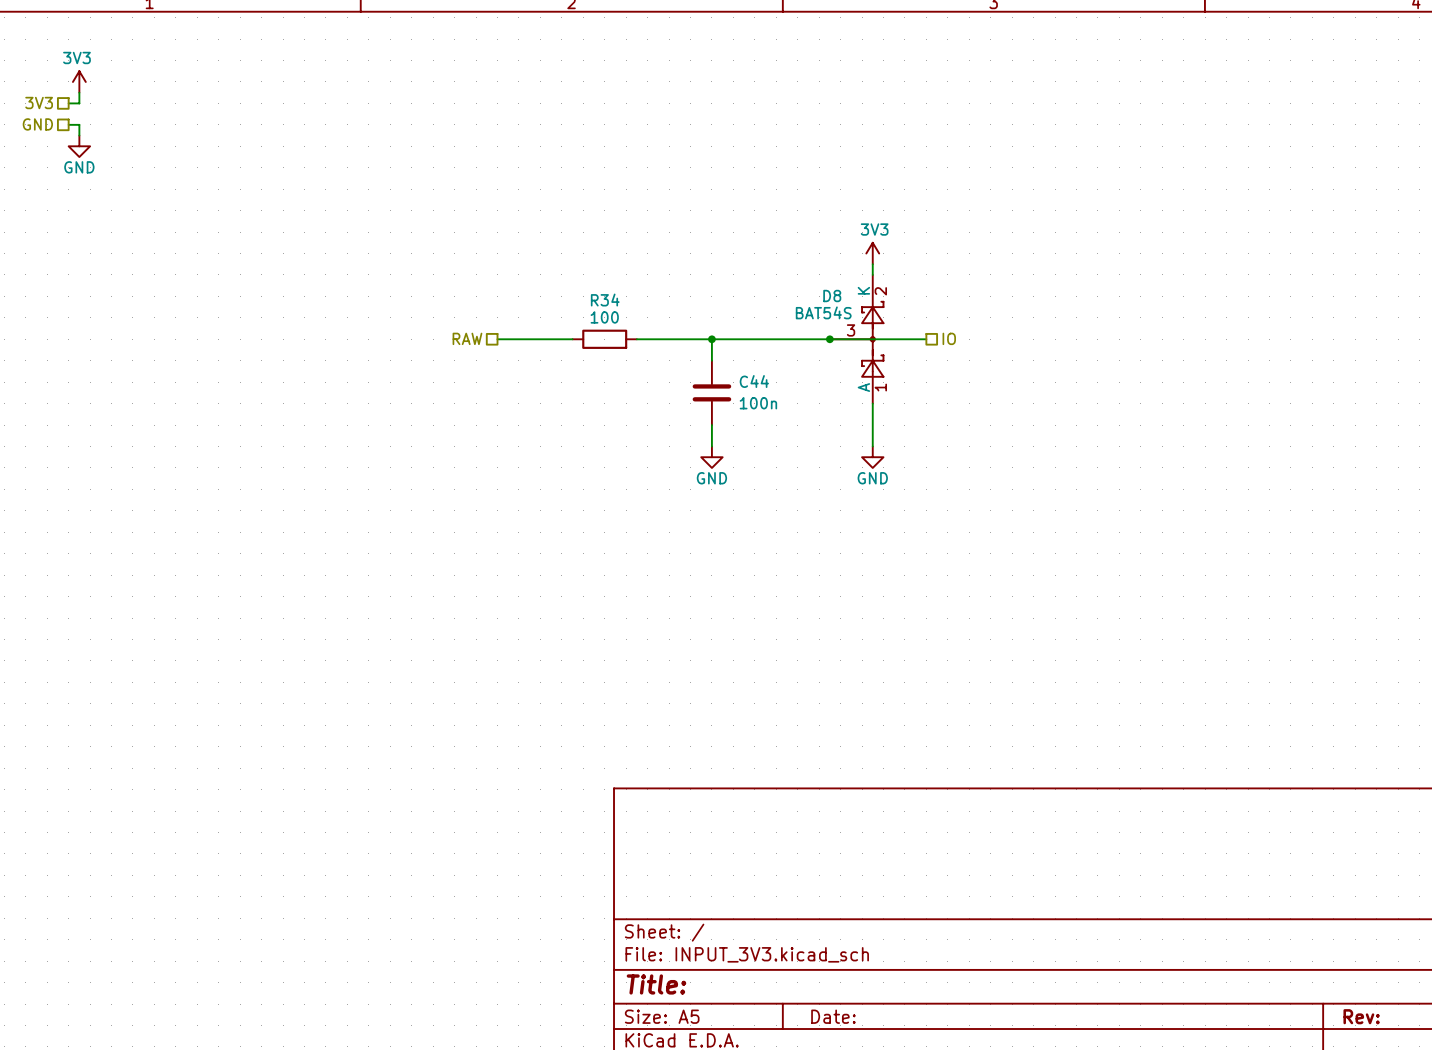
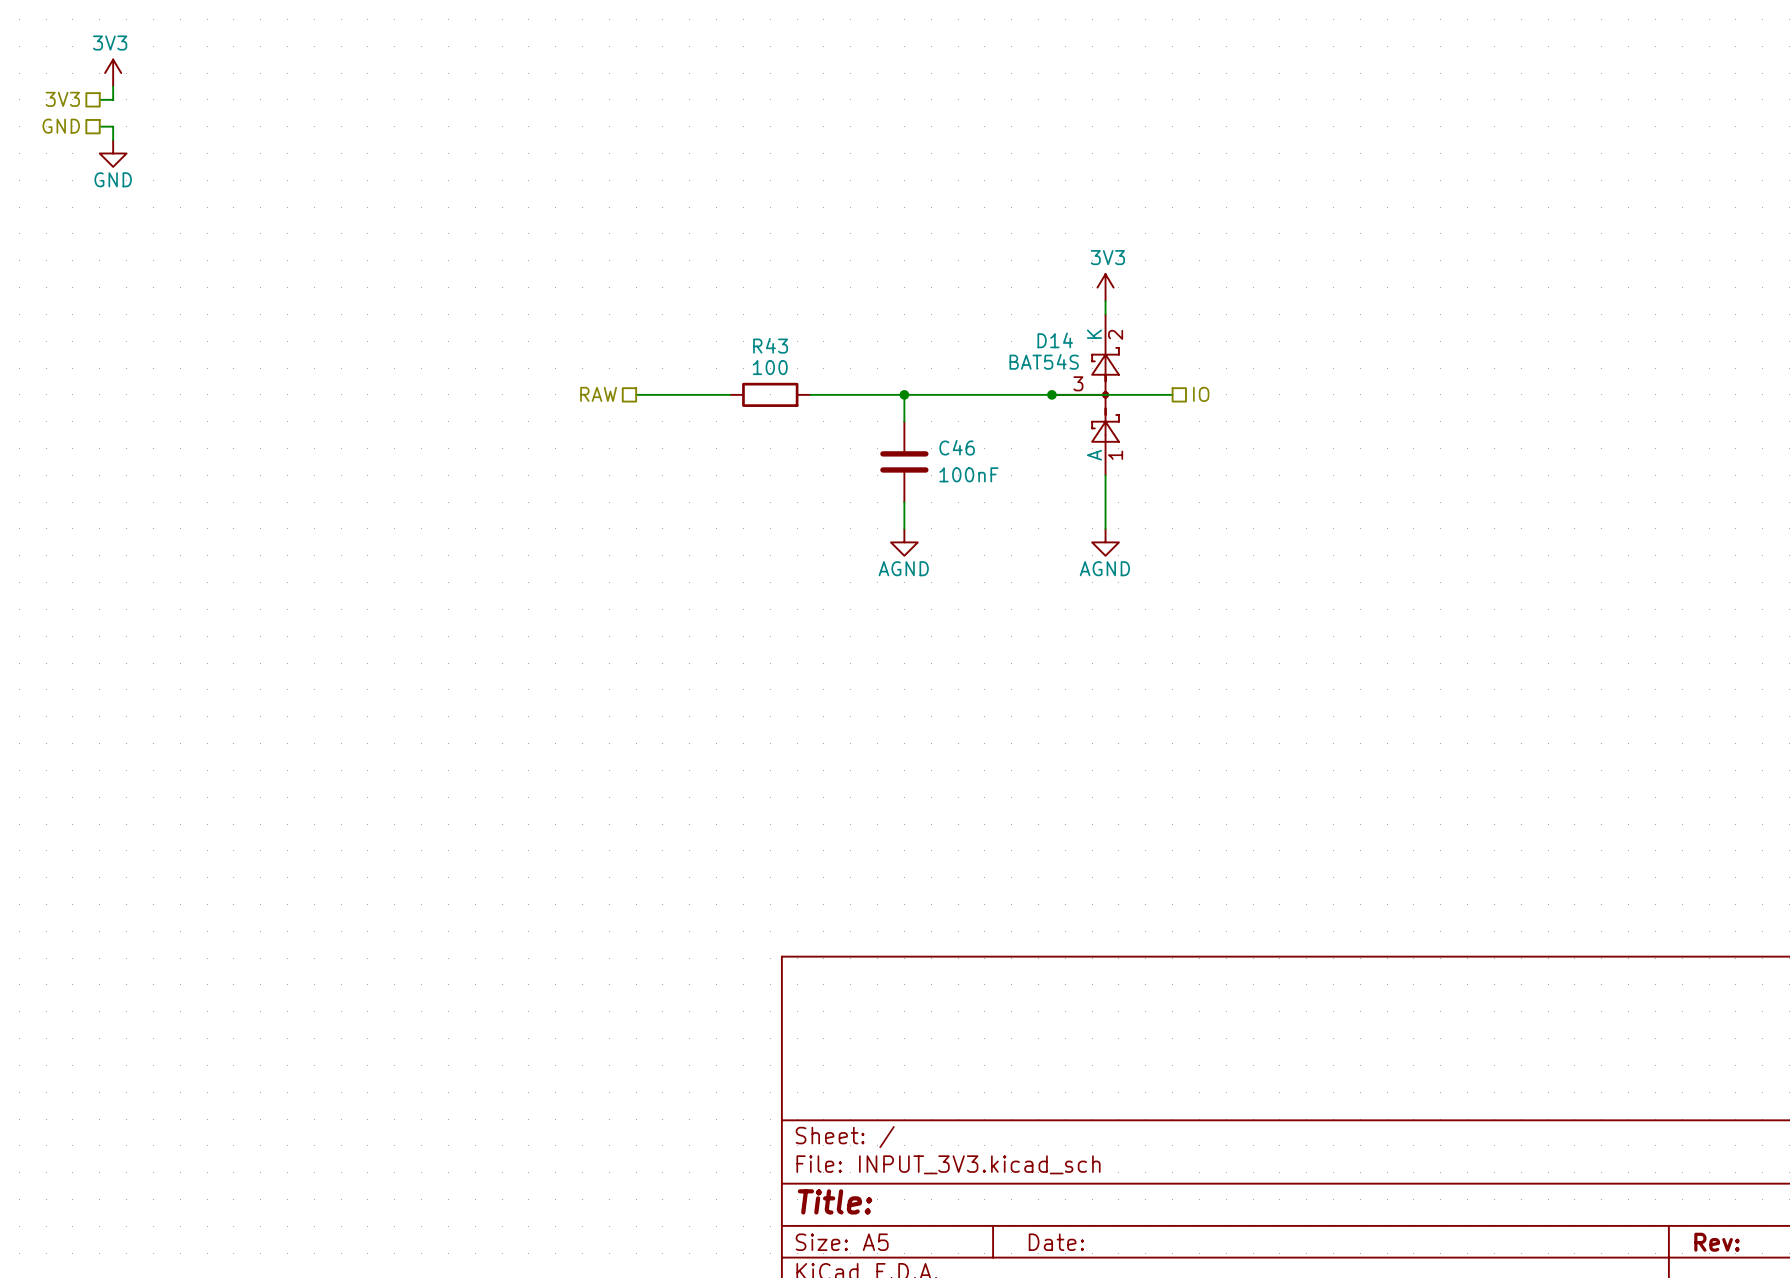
D8 name: D8 (832, 296) -> D14 (1055, 340)
R34 name: R34 (605, 300) -> R43 (770, 345)
C44 name: C44 (754, 381) -> C46 (957, 447)
C44 value: 100n (758, 403) -> 100nF (968, 474)
power symbol: GND (711, 457) -> AGND (904, 542)
power symbol: GND (872, 457) -> AGND (1105, 542)

